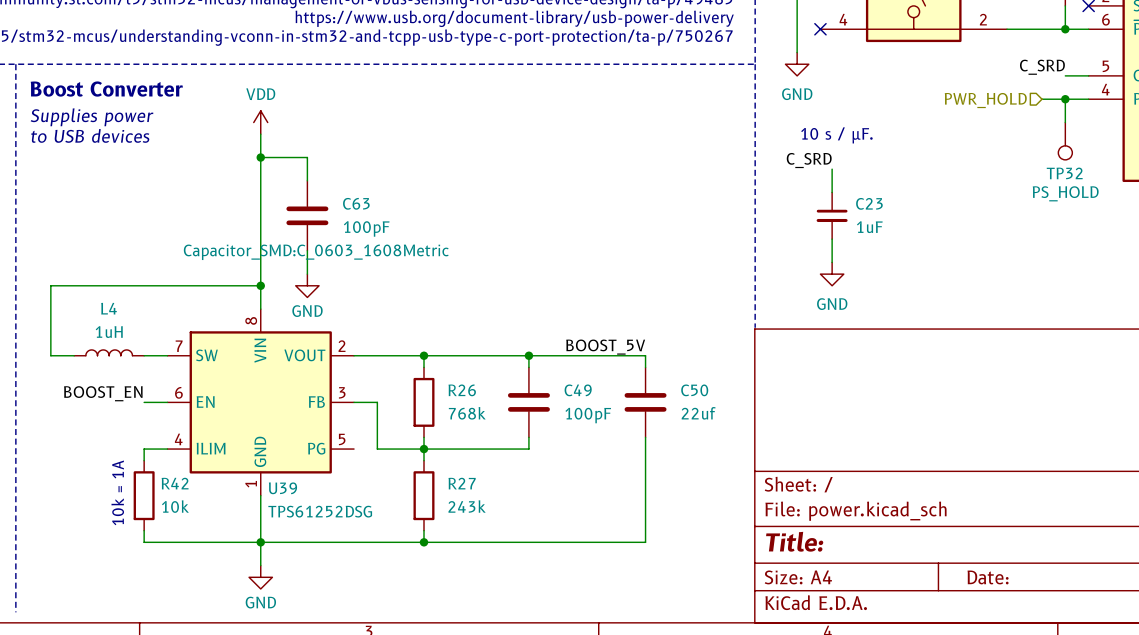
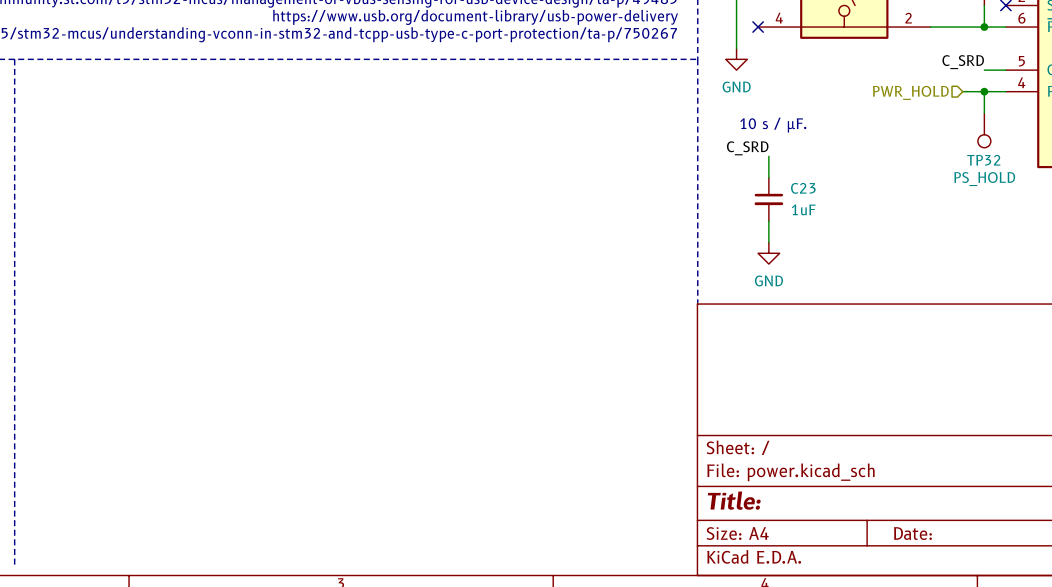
text: Boost Converter (106, 89) -> none
text: Supplies power (92, 117) -> none
power symbol: VDD (260, 122) -> none
wire: (260, 134) (260, 309) -> none
text: to USB devices (90, 135) -> none
wire: (260, 157) (307, 157) (307, 180) -> none
junction: (260, 157) -> none
C63: 100pF (307, 215) -> none
wire: (307, 250) (307, 274) -> none
wire: (260, 285) (50, 285) (50, 355) (74, 355) -> none
junction: (260, 285) -> none
power symbol: GND (307, 285) -> none
label: BOOST_5V (605, 347) -> none
L4: 1uH (109, 352) -> none
wire: (144, 355) (167, 355) -> none
wire: (354, 355) (645, 355) (645, 367) -> none
wire: (423, 355) (423, 367) -> none
junction: (423, 355) -> none
wire: (528, 355) (528, 367) -> none
junction: (528, 355) -> none
label: BOOST_EN (103, 393) -> none
wire: (144, 402) (167, 402) -> none
U39: TPS61252DSG (260, 402) -> none
wire: (354, 402) (377, 402) (377, 449) (528, 449) (528, 437) -> none
R26: 768k (423, 402) -> none
C49: 100pF (528, 402) -> none
C50: 22uf (645, 402) -> none
wire: (423, 437) (423, 460) -> none
wire: (645, 437) (645, 542) (144, 542) (144, 530) -> none
wire: (167, 449) (144, 449) (144, 460) -> none
junction: (423, 449) -> none
text: 10k = 1A (117, 492) -> none
R42: 10k (144, 495) -> none
wire: (260, 495) (260, 565) -> none
R27: 243k (423, 495) -> none
wire: (423, 530) (423, 542) -> none
junction: (260, 542) -> none
junction: (423, 542) -> none
power symbol: GND (260, 577) -> none

